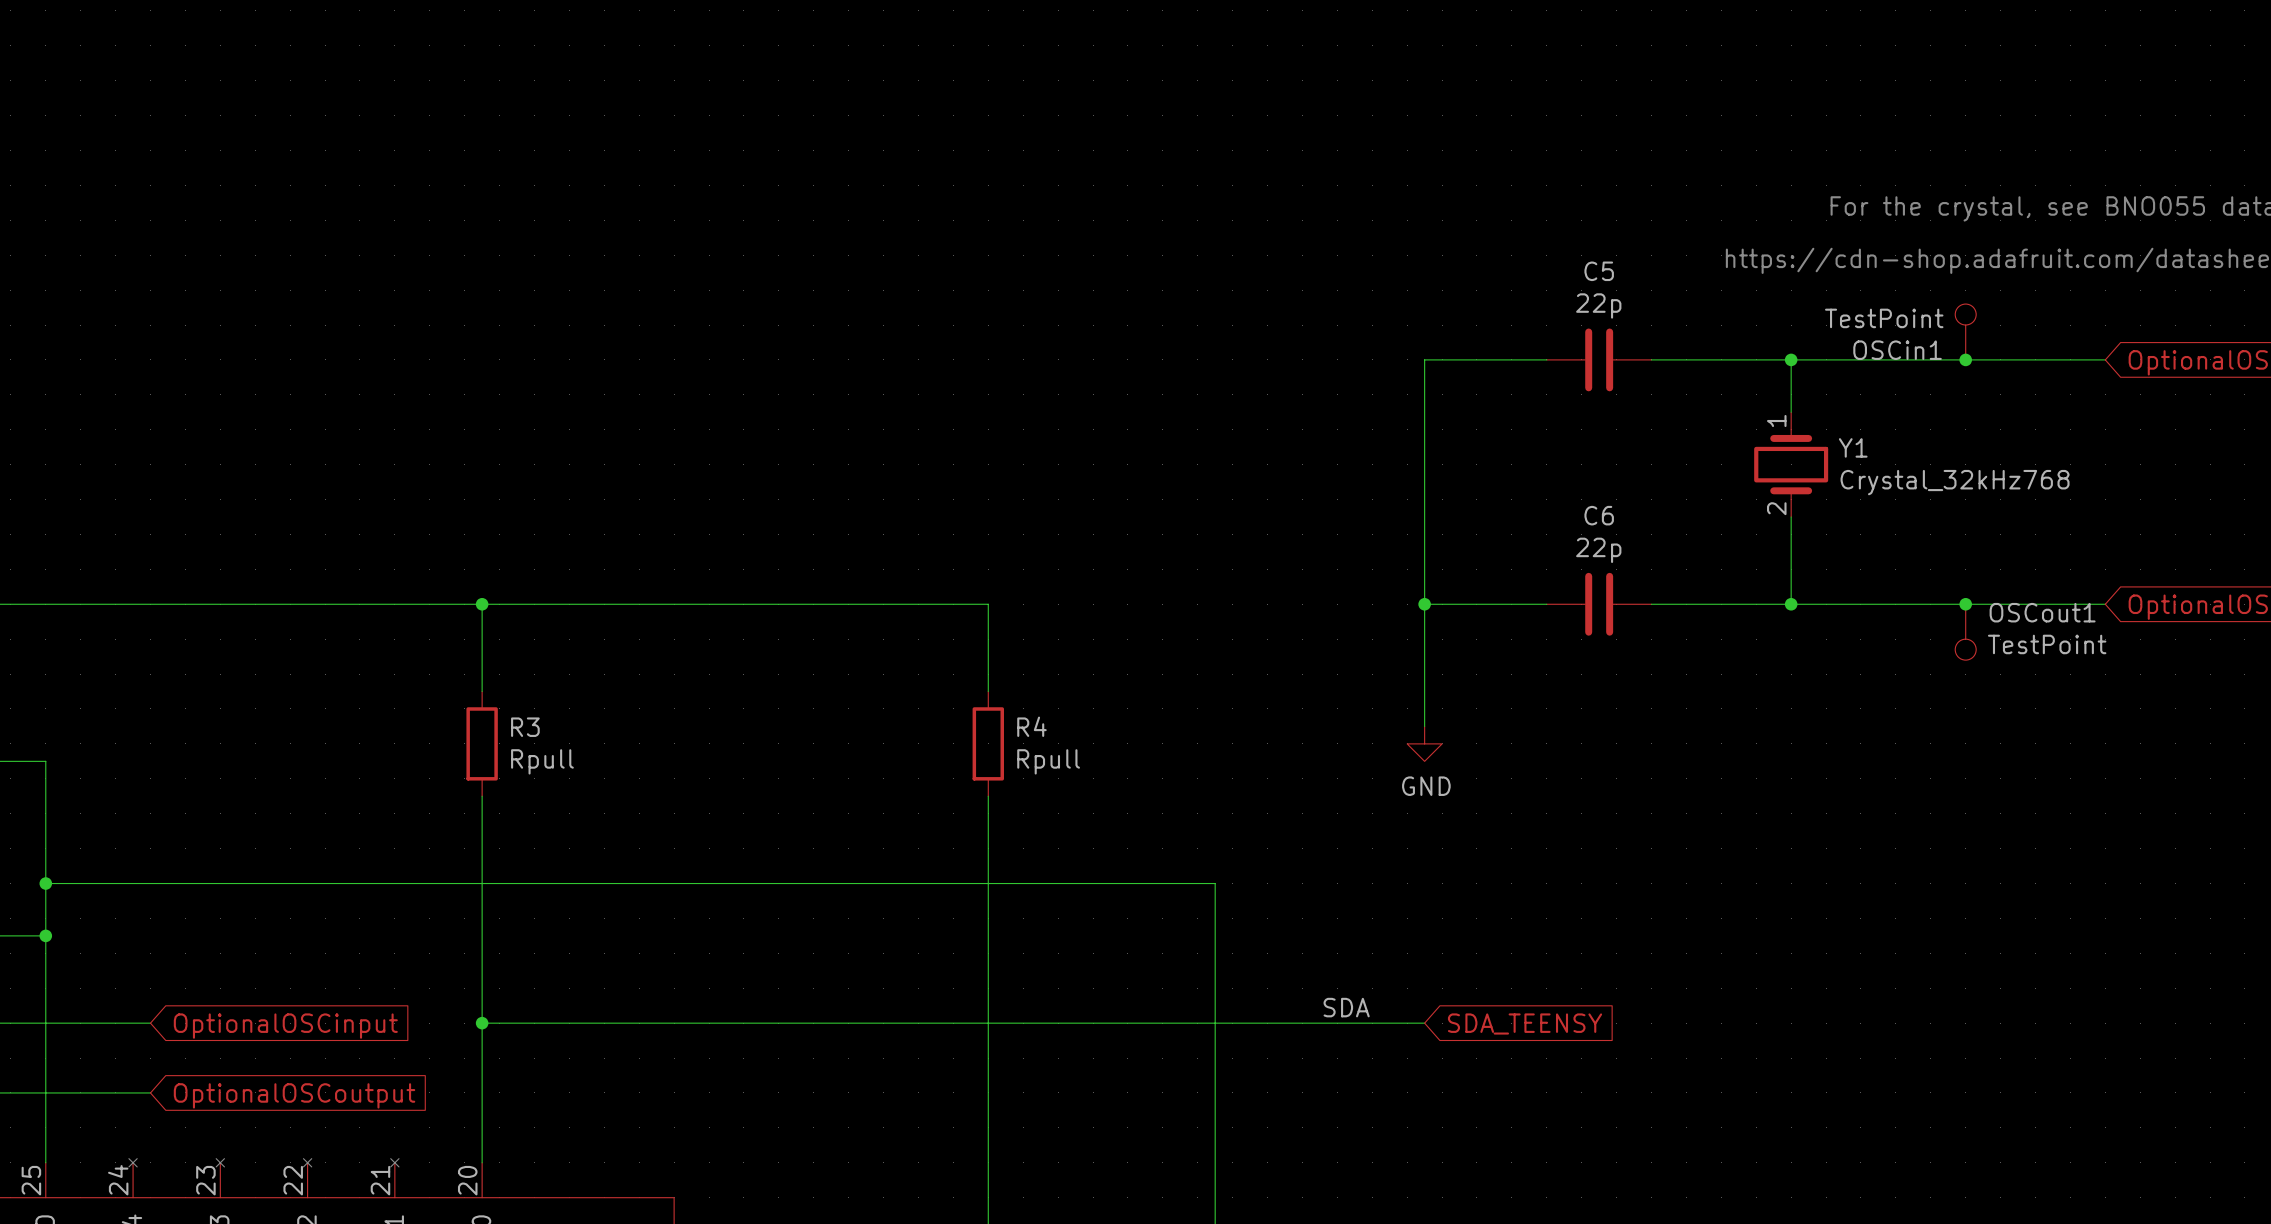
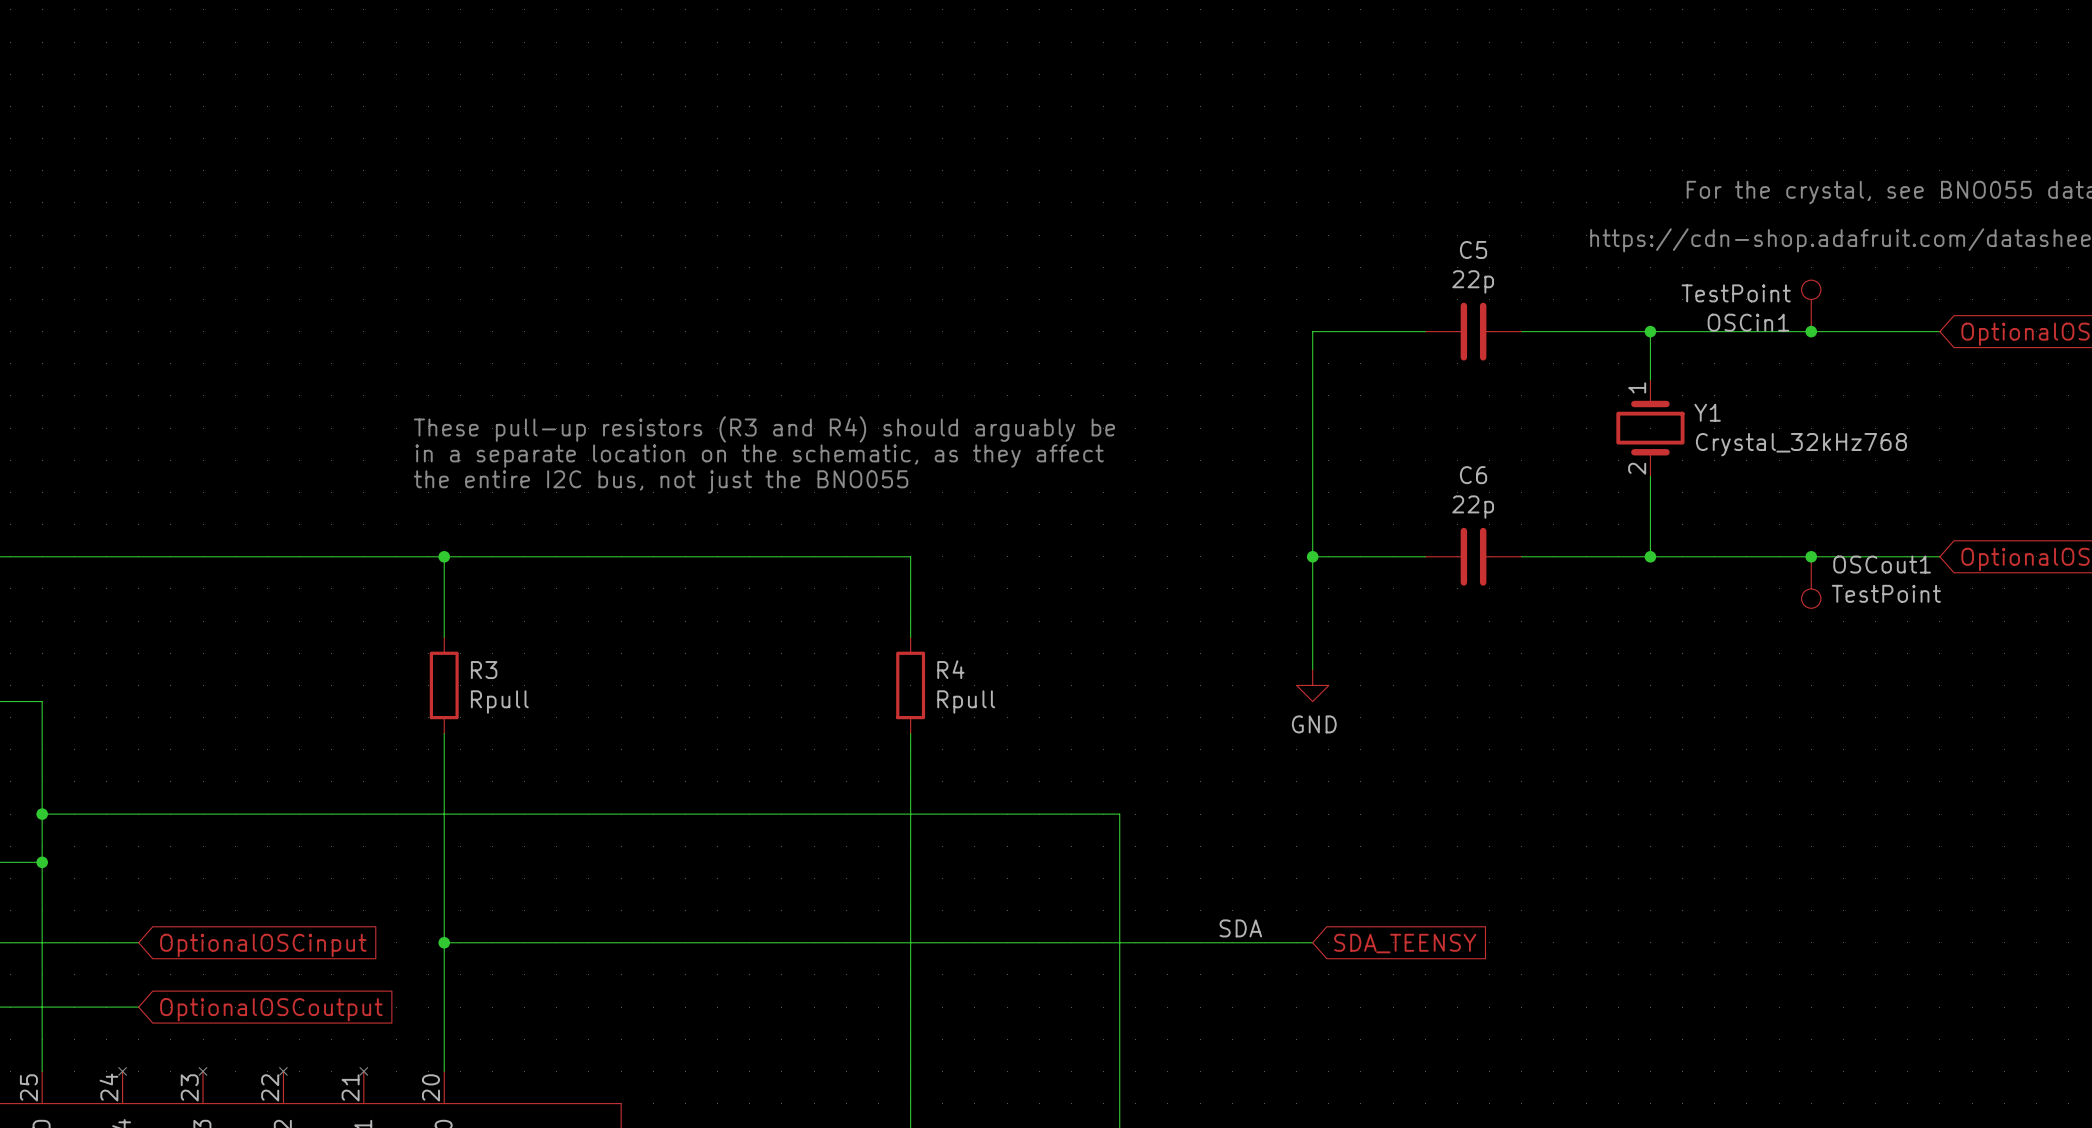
text: none -> These pull-up resistors (R3 and R4) should arguably be (764, 429)
text: none -> in a separate location on the schematic, as they affect (759, 456)
text: none -> the entire I2C bus, not just the BNO055 (661, 481)

